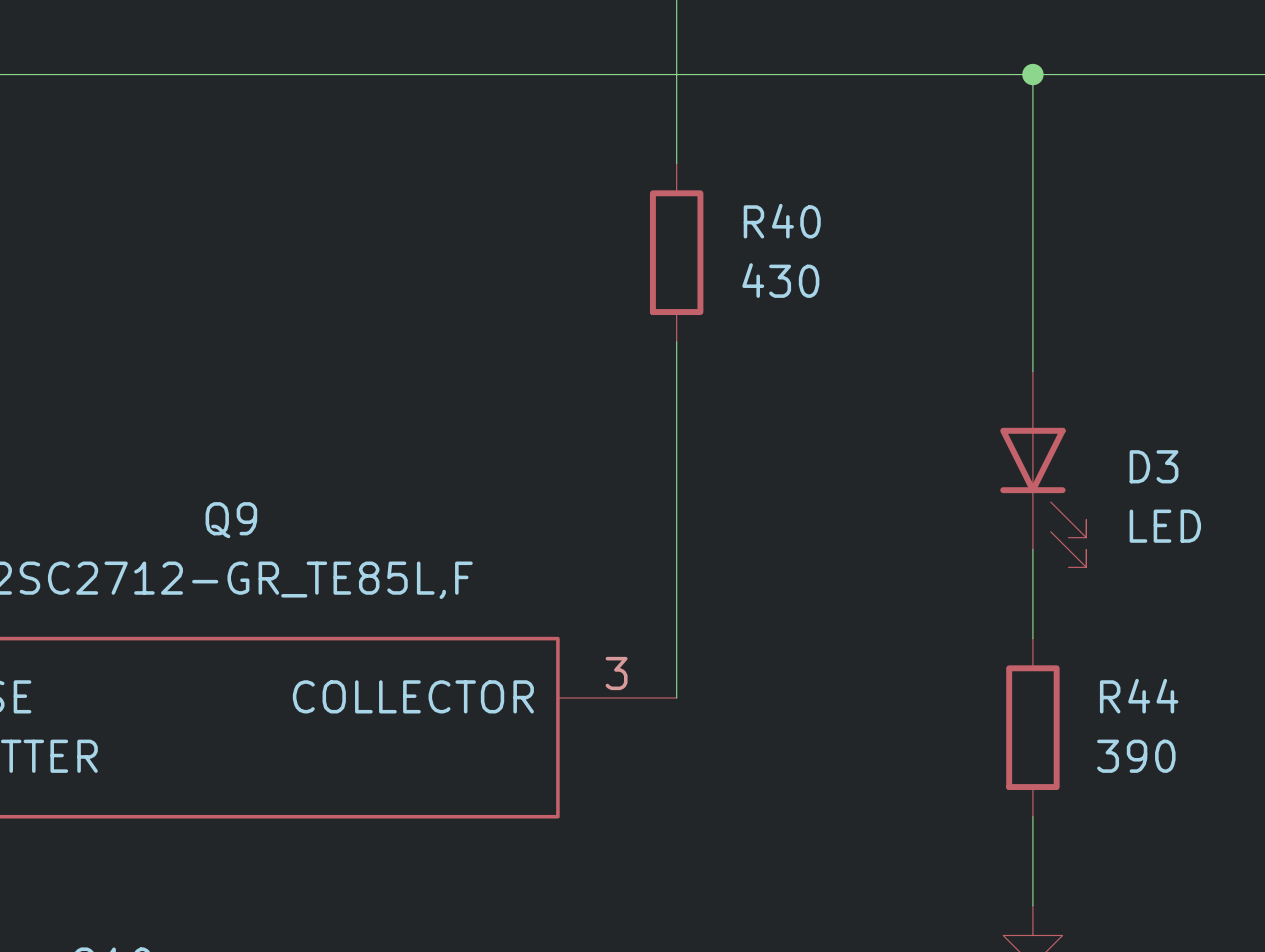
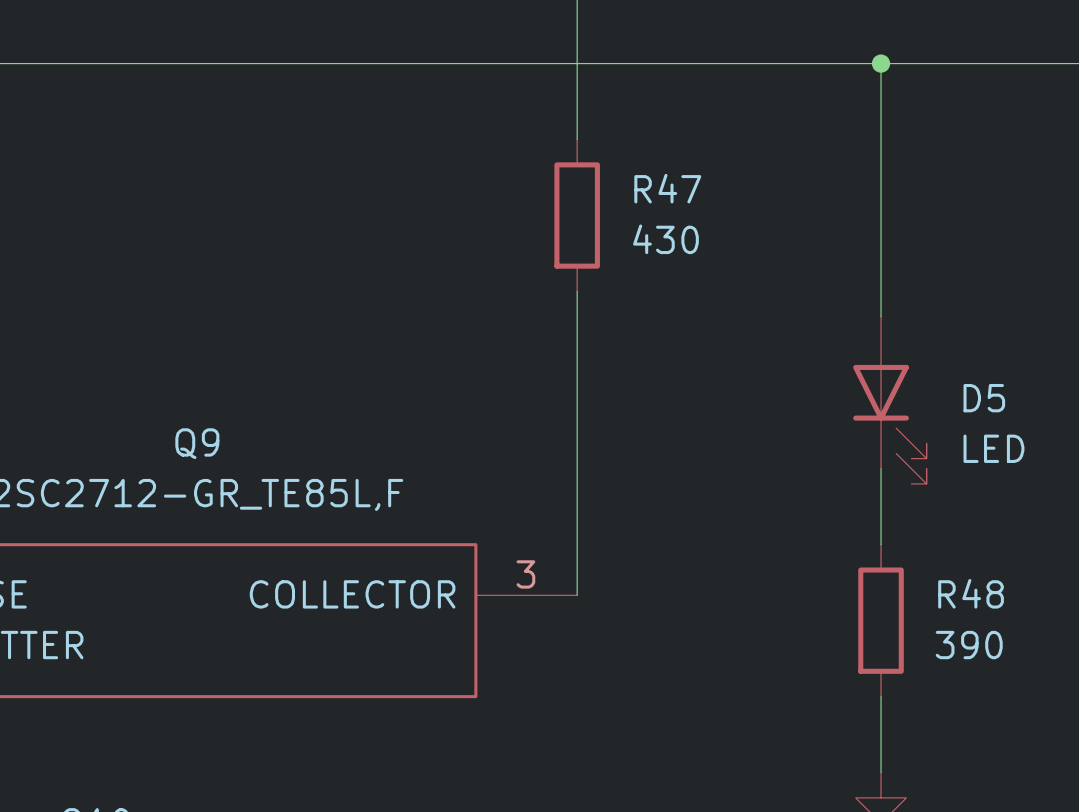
R40 name: R40 (782, 221) -> R47 (667, 188)
D3 name: D3 (1154, 466) -> D5 (984, 398)
R44 name: R44 (1139, 696) -> R48 (971, 593)

